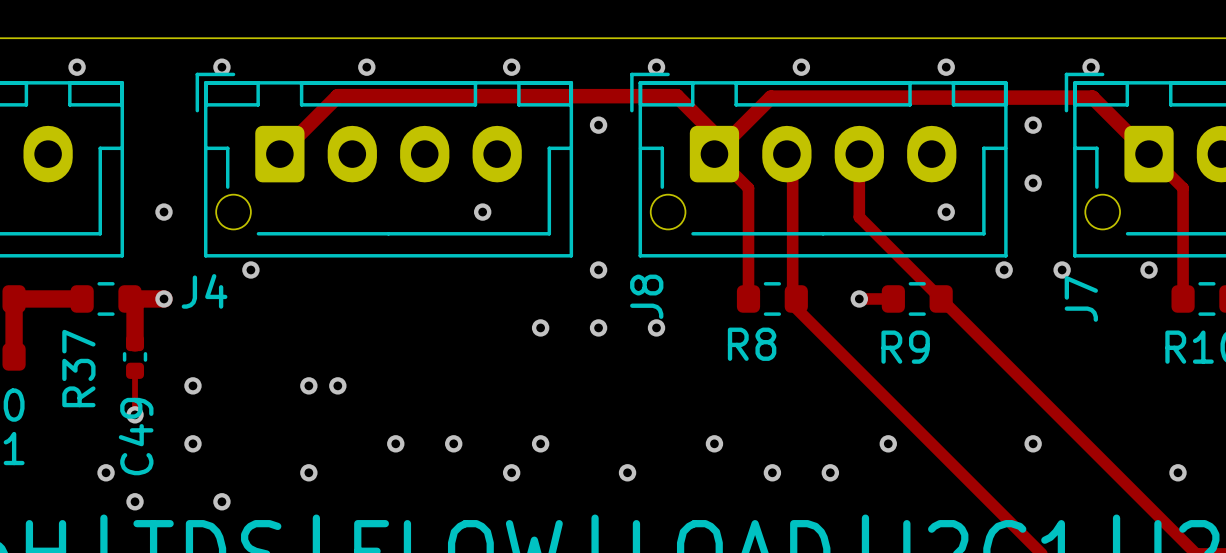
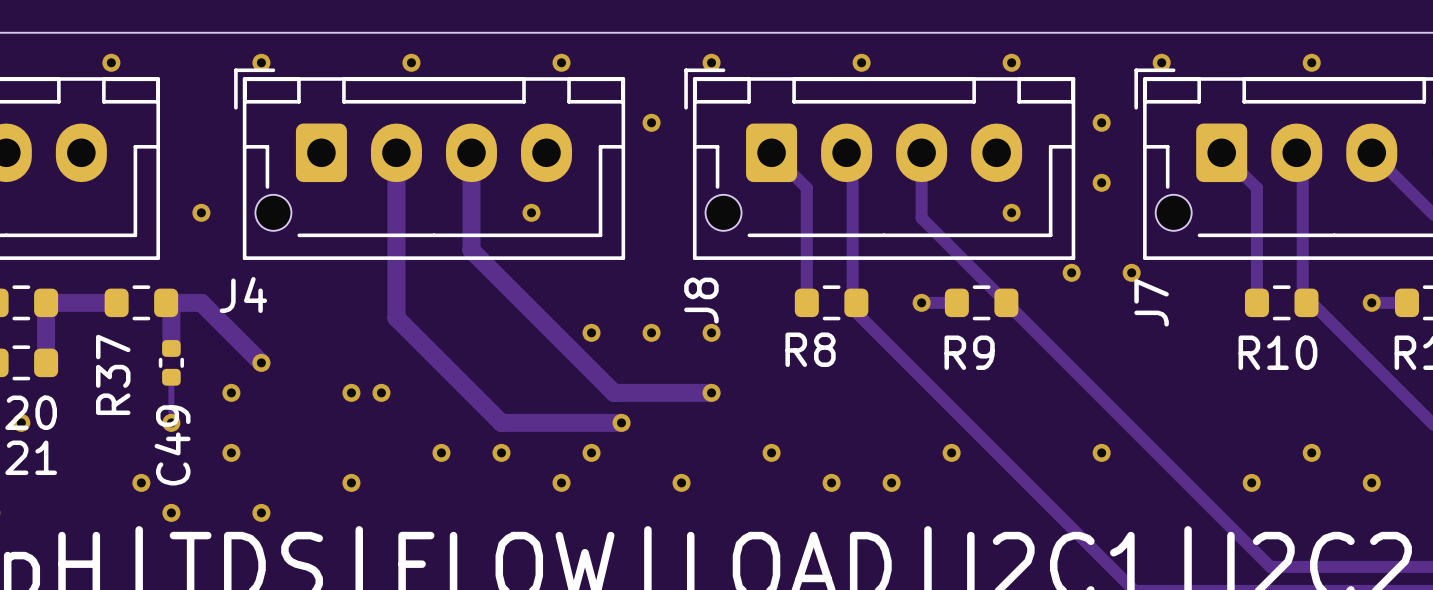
track: (714, 133) (676, 96) (337, 96) (279, 154) -> none
track: none -> (396, 152) (396, 317) (501, 422) (621, 422)
track: none -> (471, 152) (471, 250) (614, 392) (711, 392)
track: (714, 154) (770, 97) (1092, 97) (1149, 154) -> none
via: (250, 269) -> none
via: (598, 269) -> none
via: (1149, 269) -> none
track: none -> (201, 302) (261, 362)
via: (163, 298) -> none
via: none -> (261, 362)
via: none -> (711, 392)
via: none -> (621, 422)

